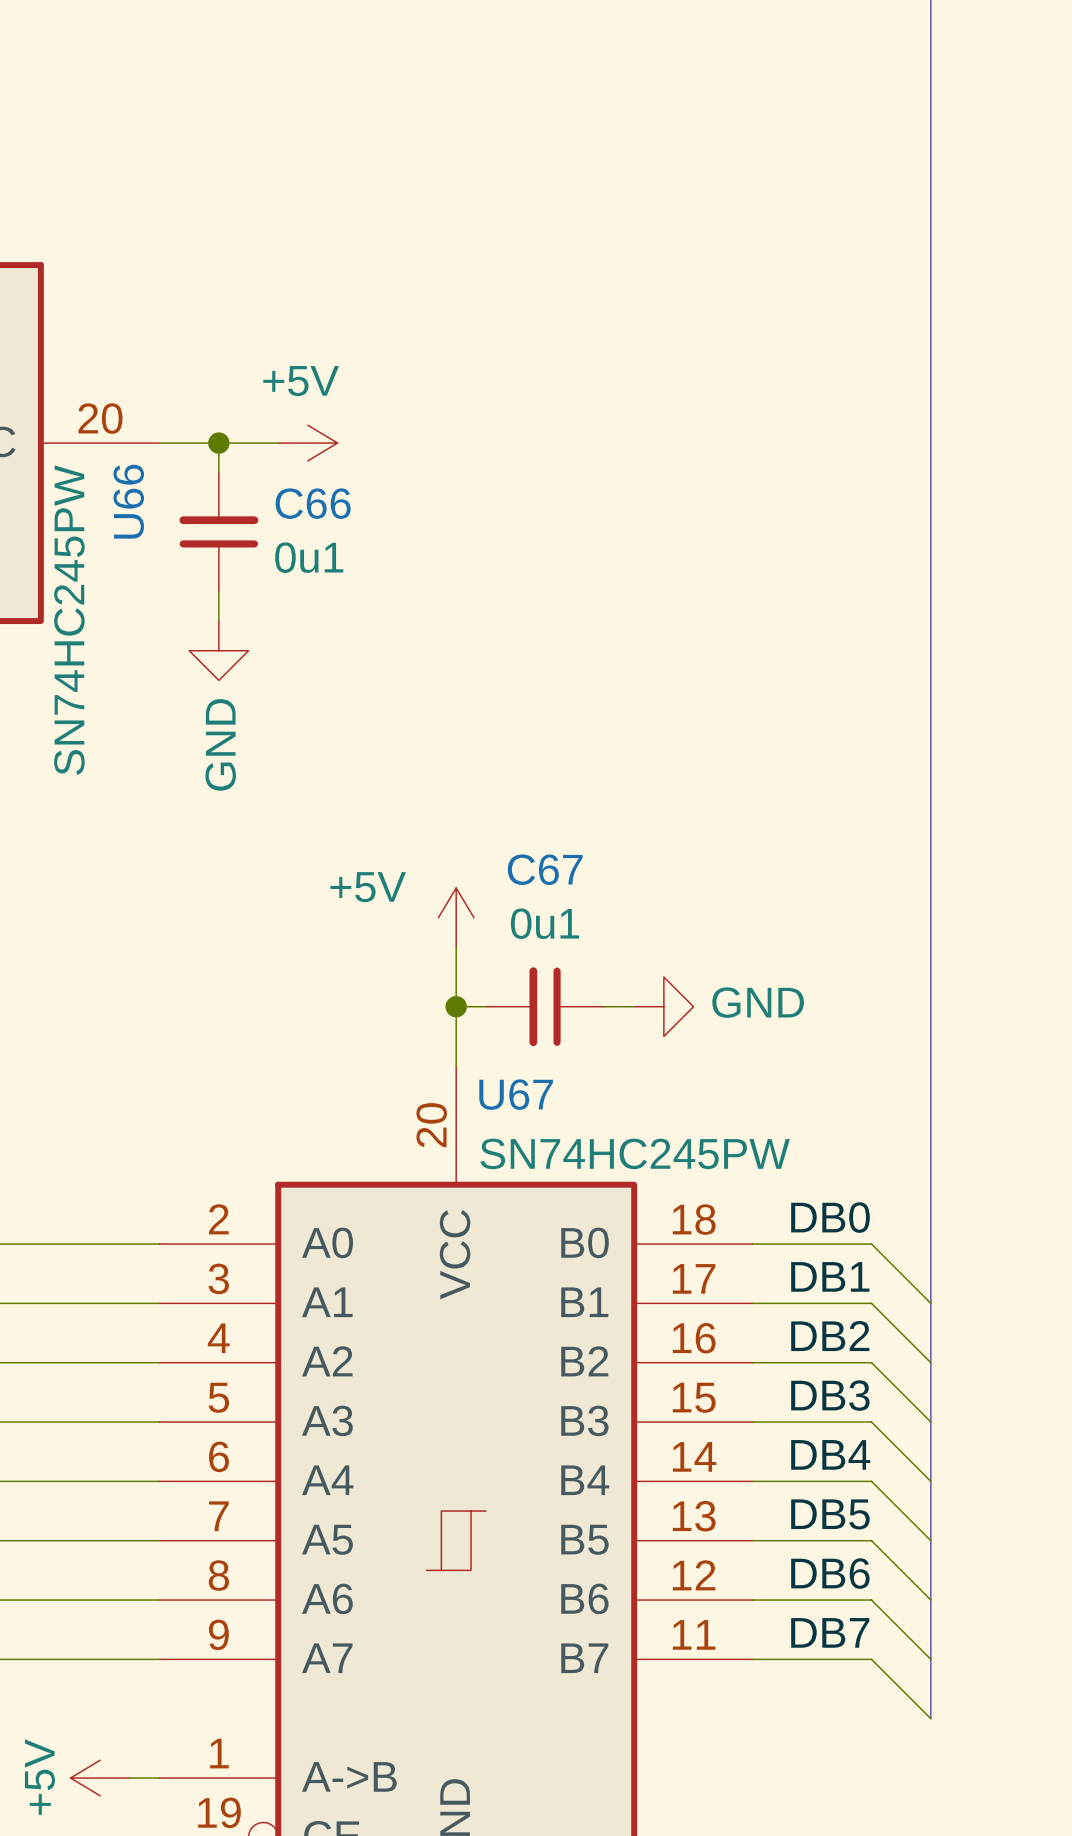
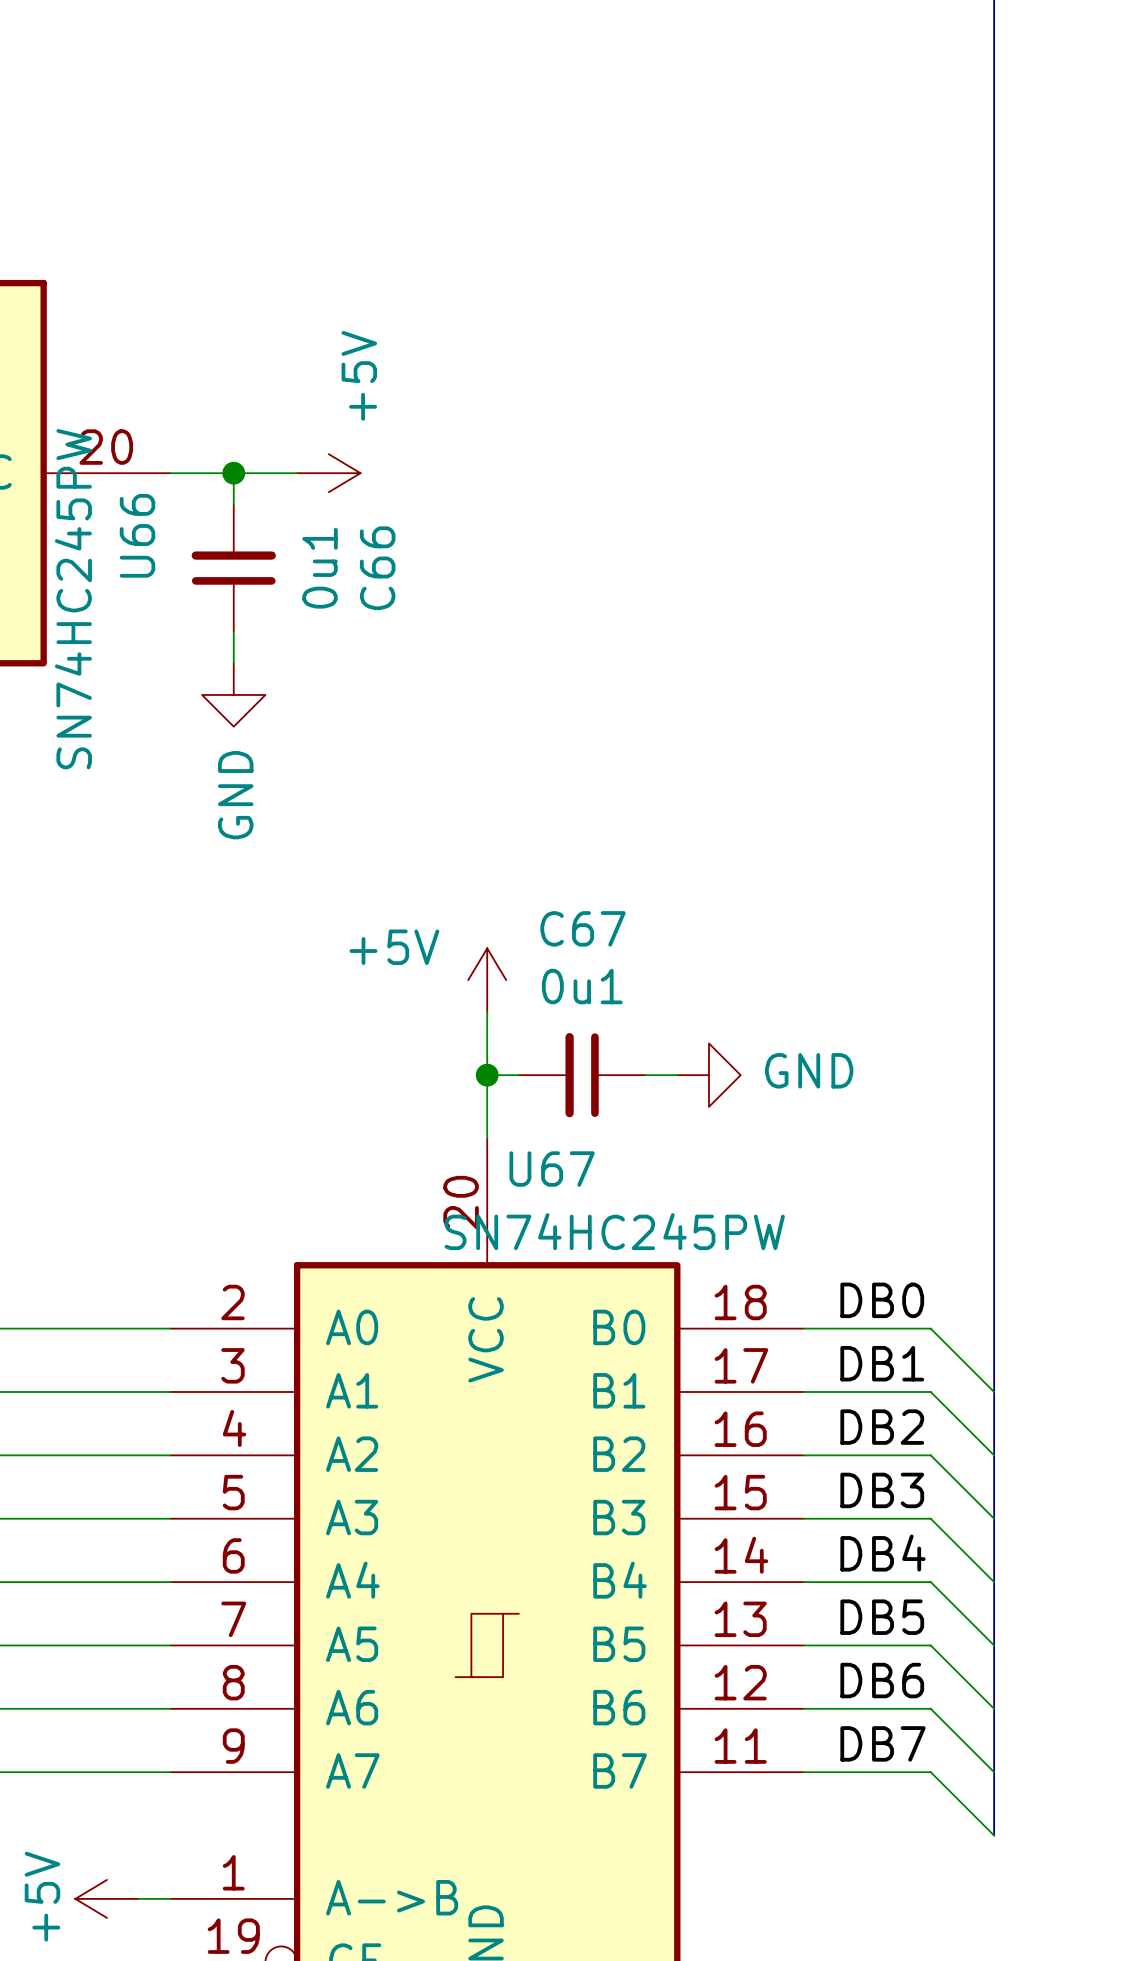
power symbol text rotation: 0° (301, 381) -> 90° counterclockwise (359, 375)
C66 name rotation: 0° (313, 503) -> 90° counterclockwise (377, 568)
C66 value rotation: 0° (309, 557) -> 90° counterclockwise (320, 568)
U66 value position: SN74HC245PW (69, 620) -> SN74HC245PW (73, 599)
U67 value position: SN74HC245PW (635, 1153) -> SN74HC245PW (614, 1231)

